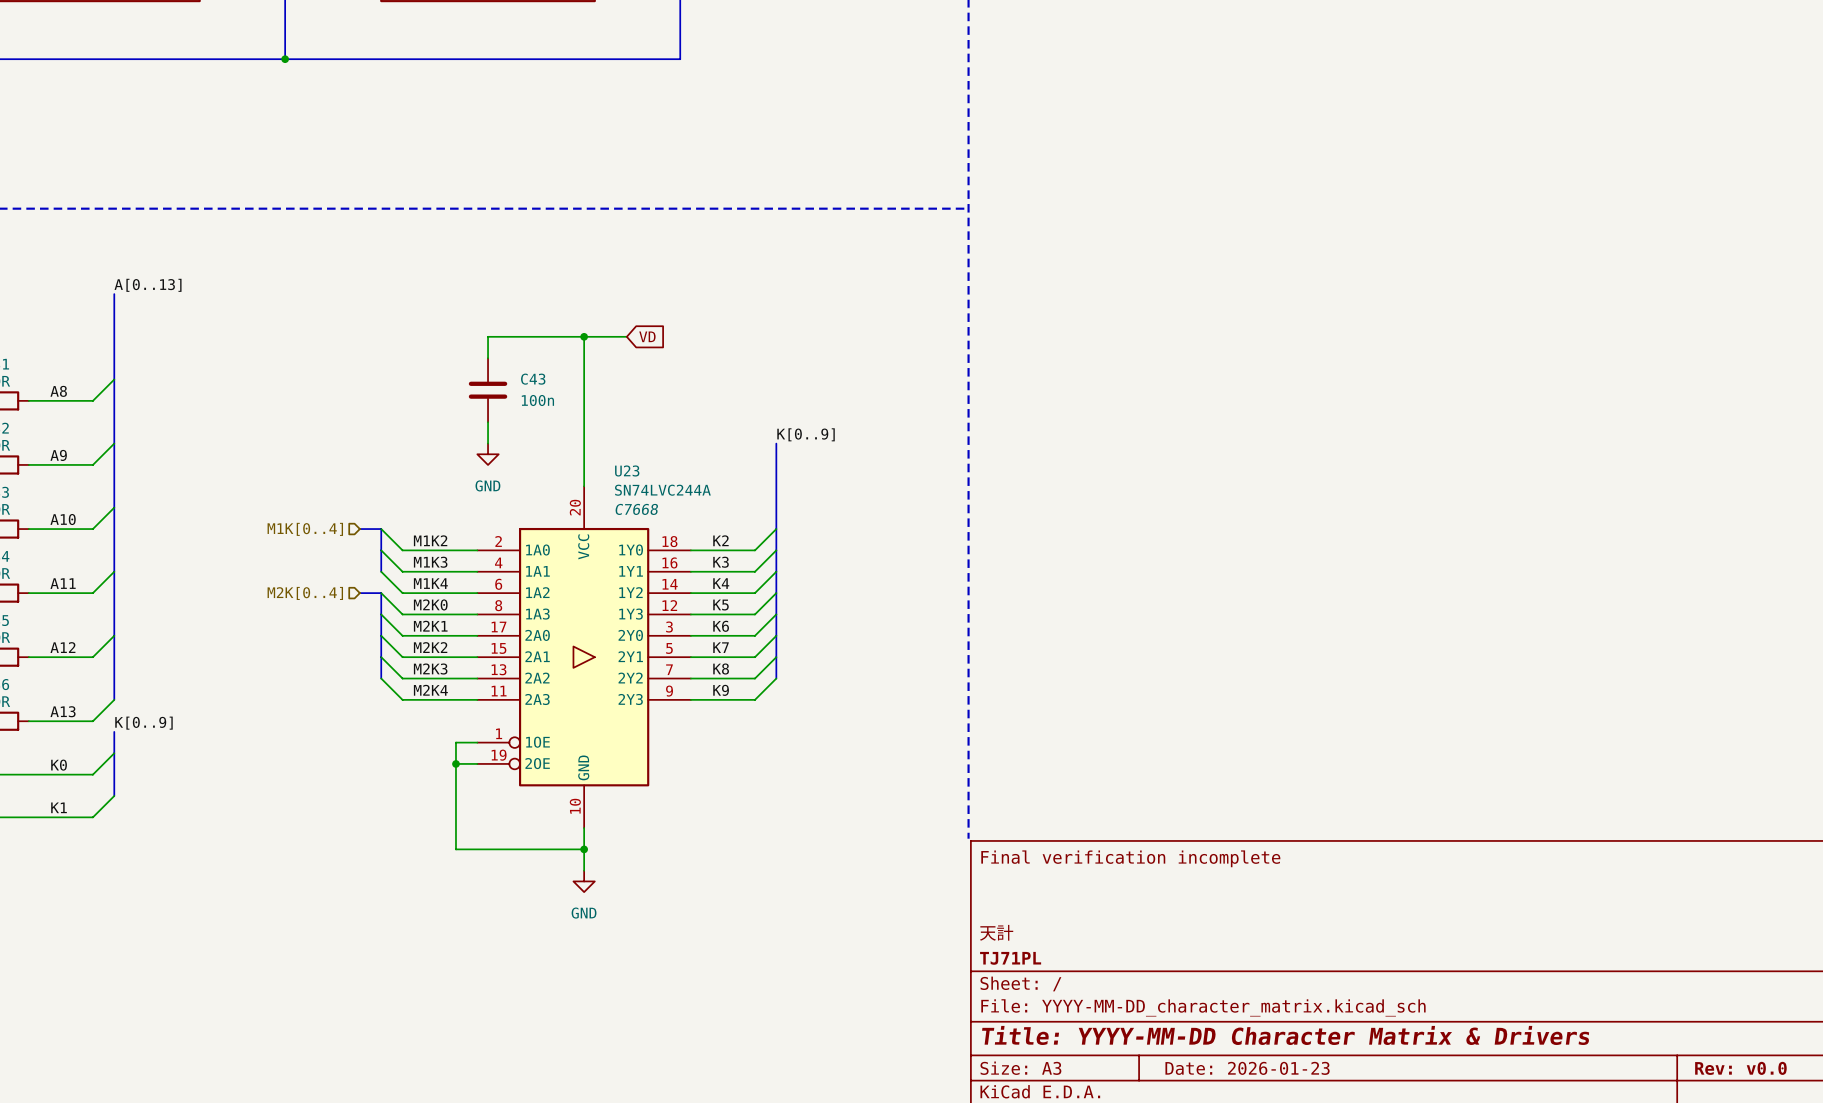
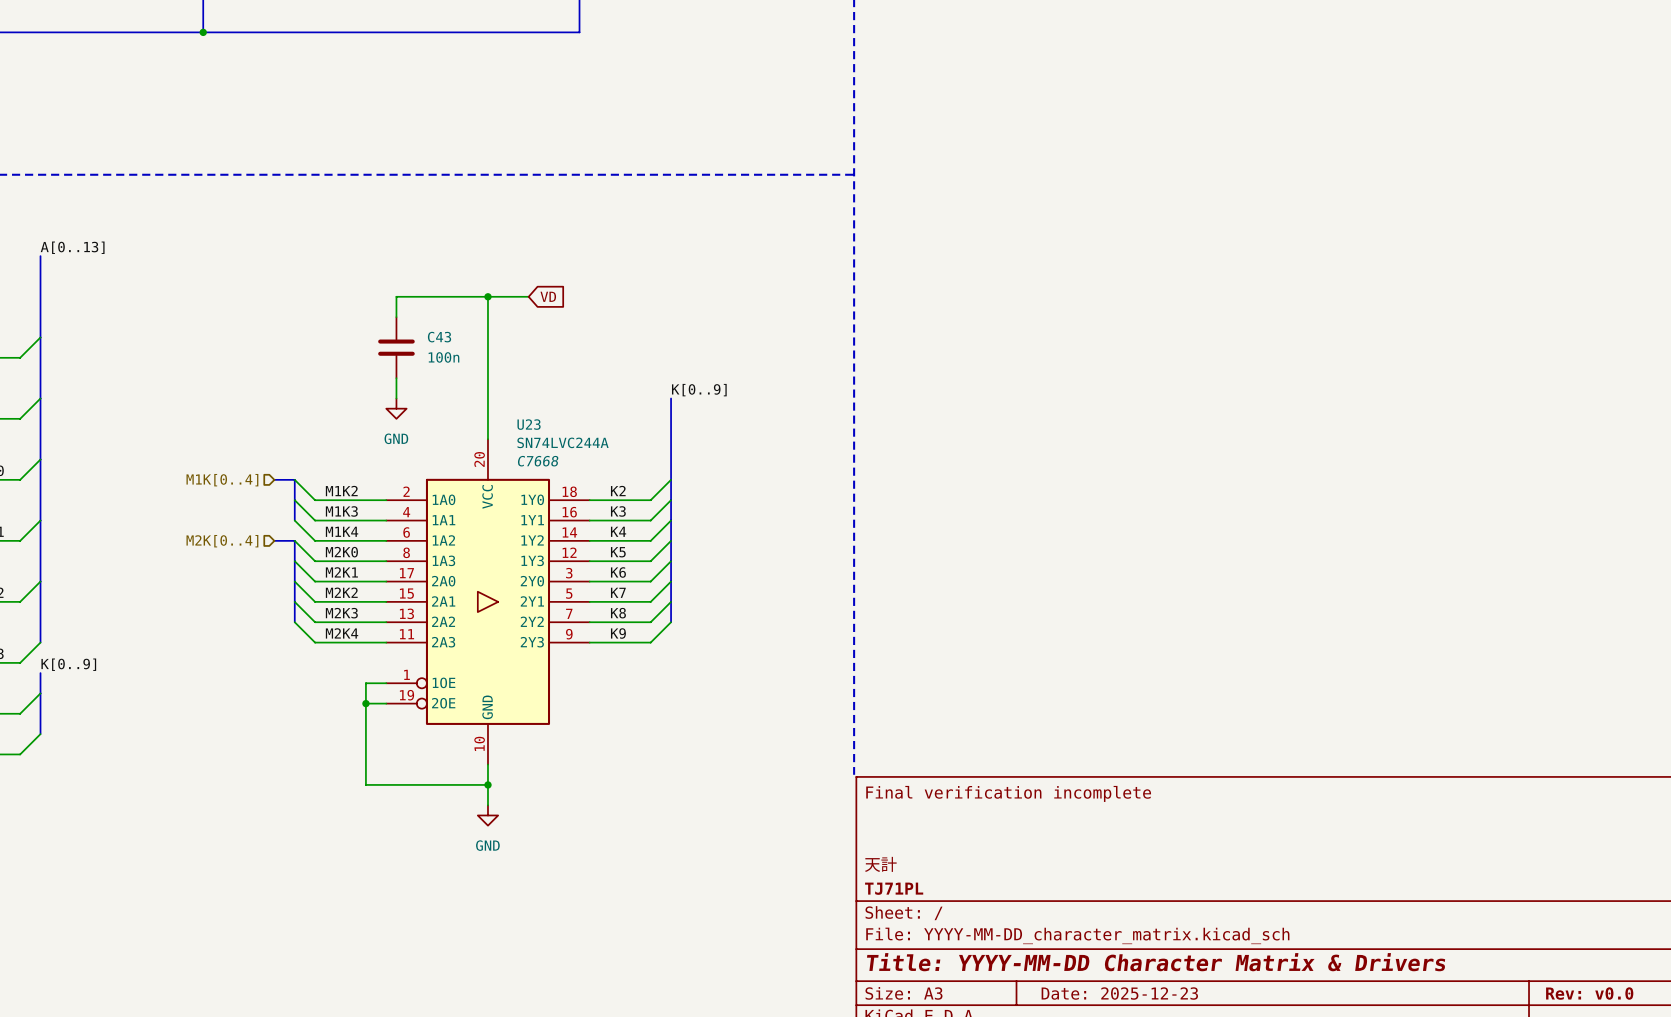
title block: Date: 2026-01-23 (1247, 1068) -> Date: 2025-12-23 (1119, 993)

